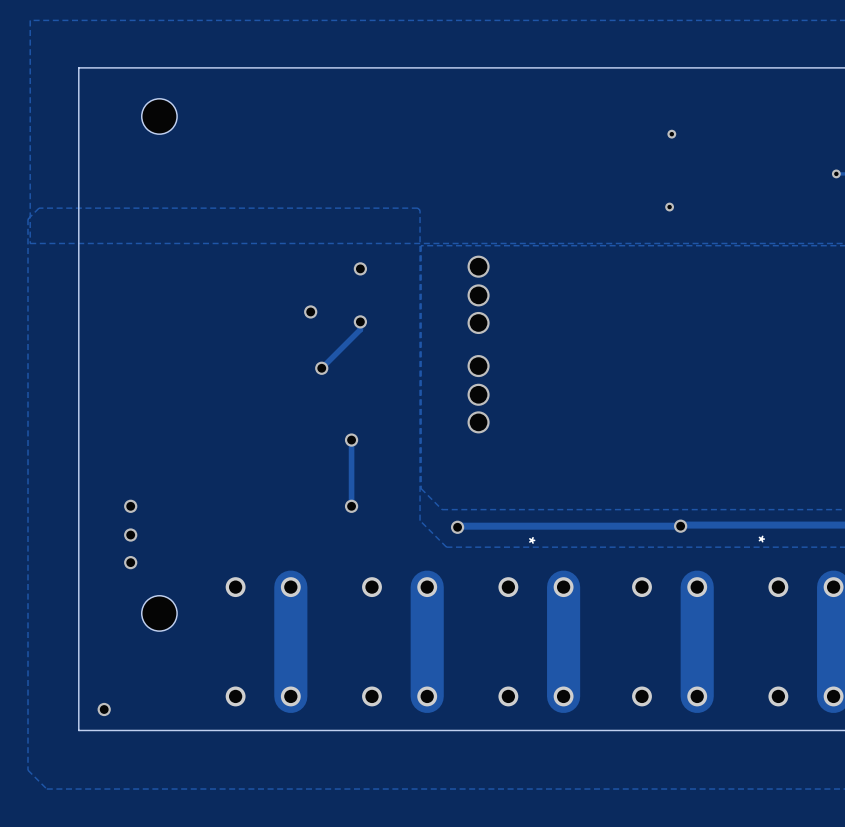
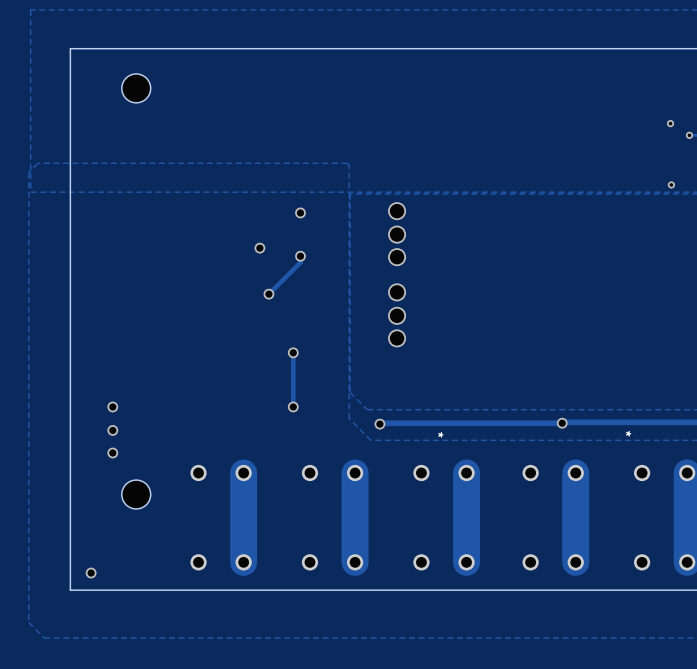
via: (671, 134) -> none
via: none -> (670, 123)
via: (669, 207) -> none
via: none -> (671, 184)

